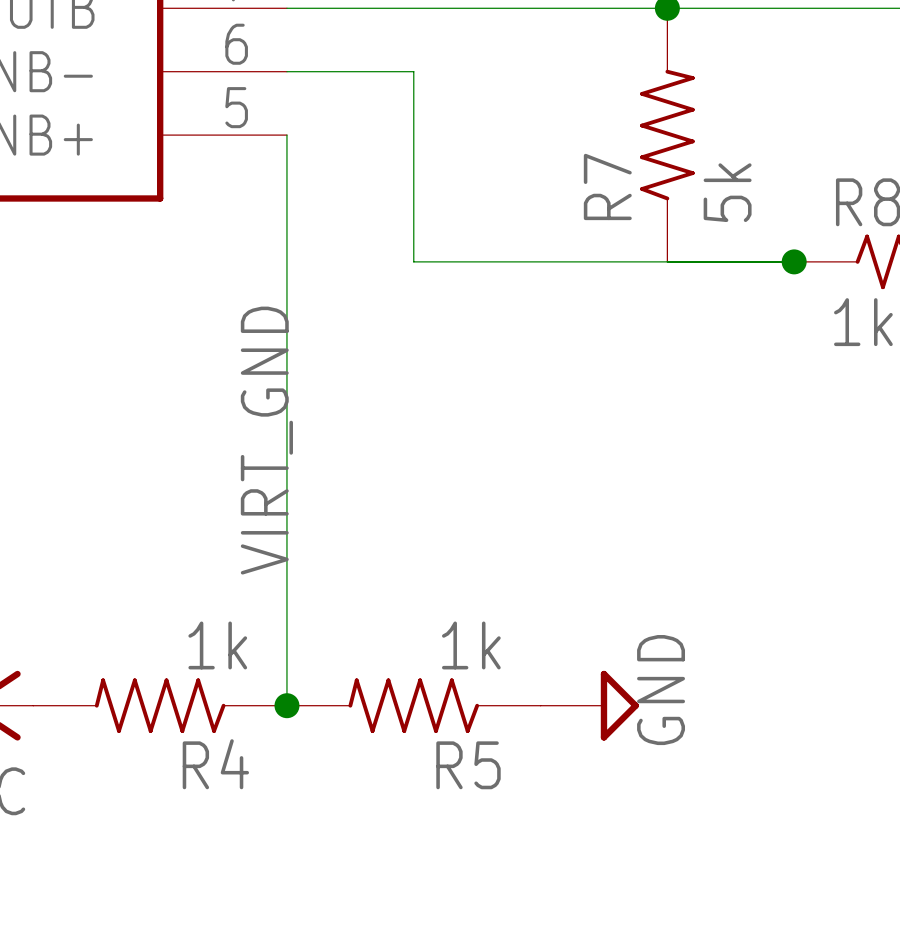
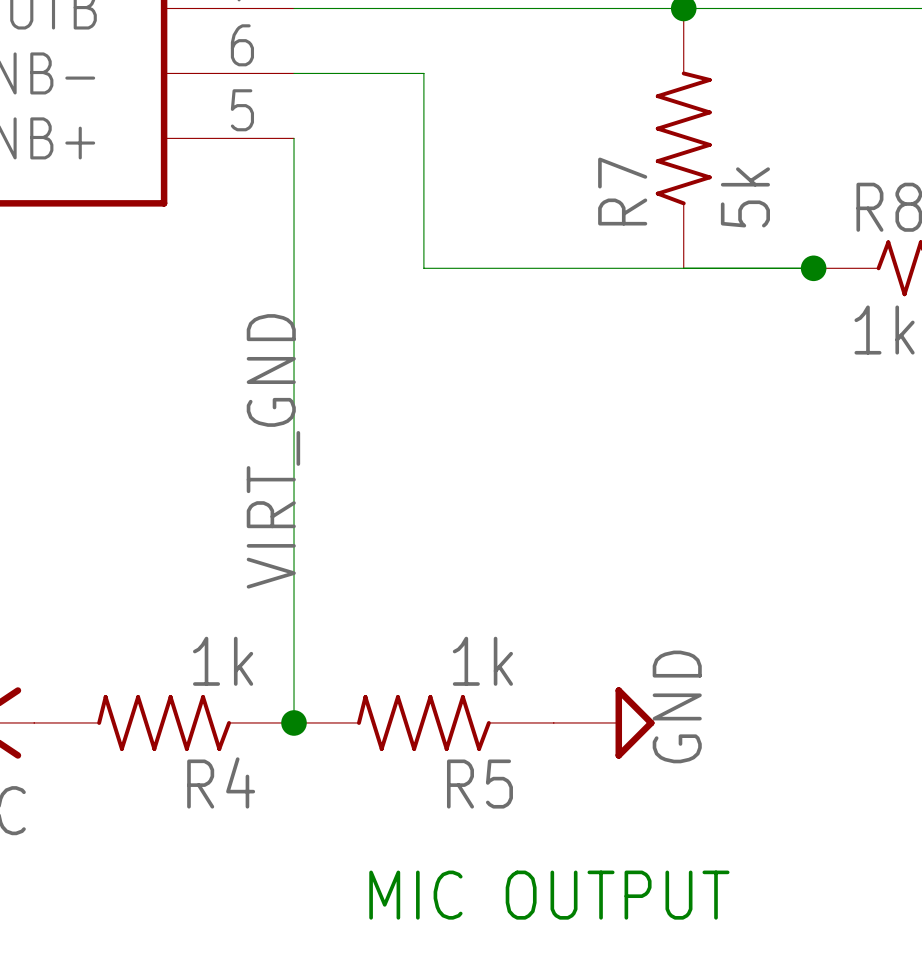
text: none -> MIC OUTPUT (549, 895)

